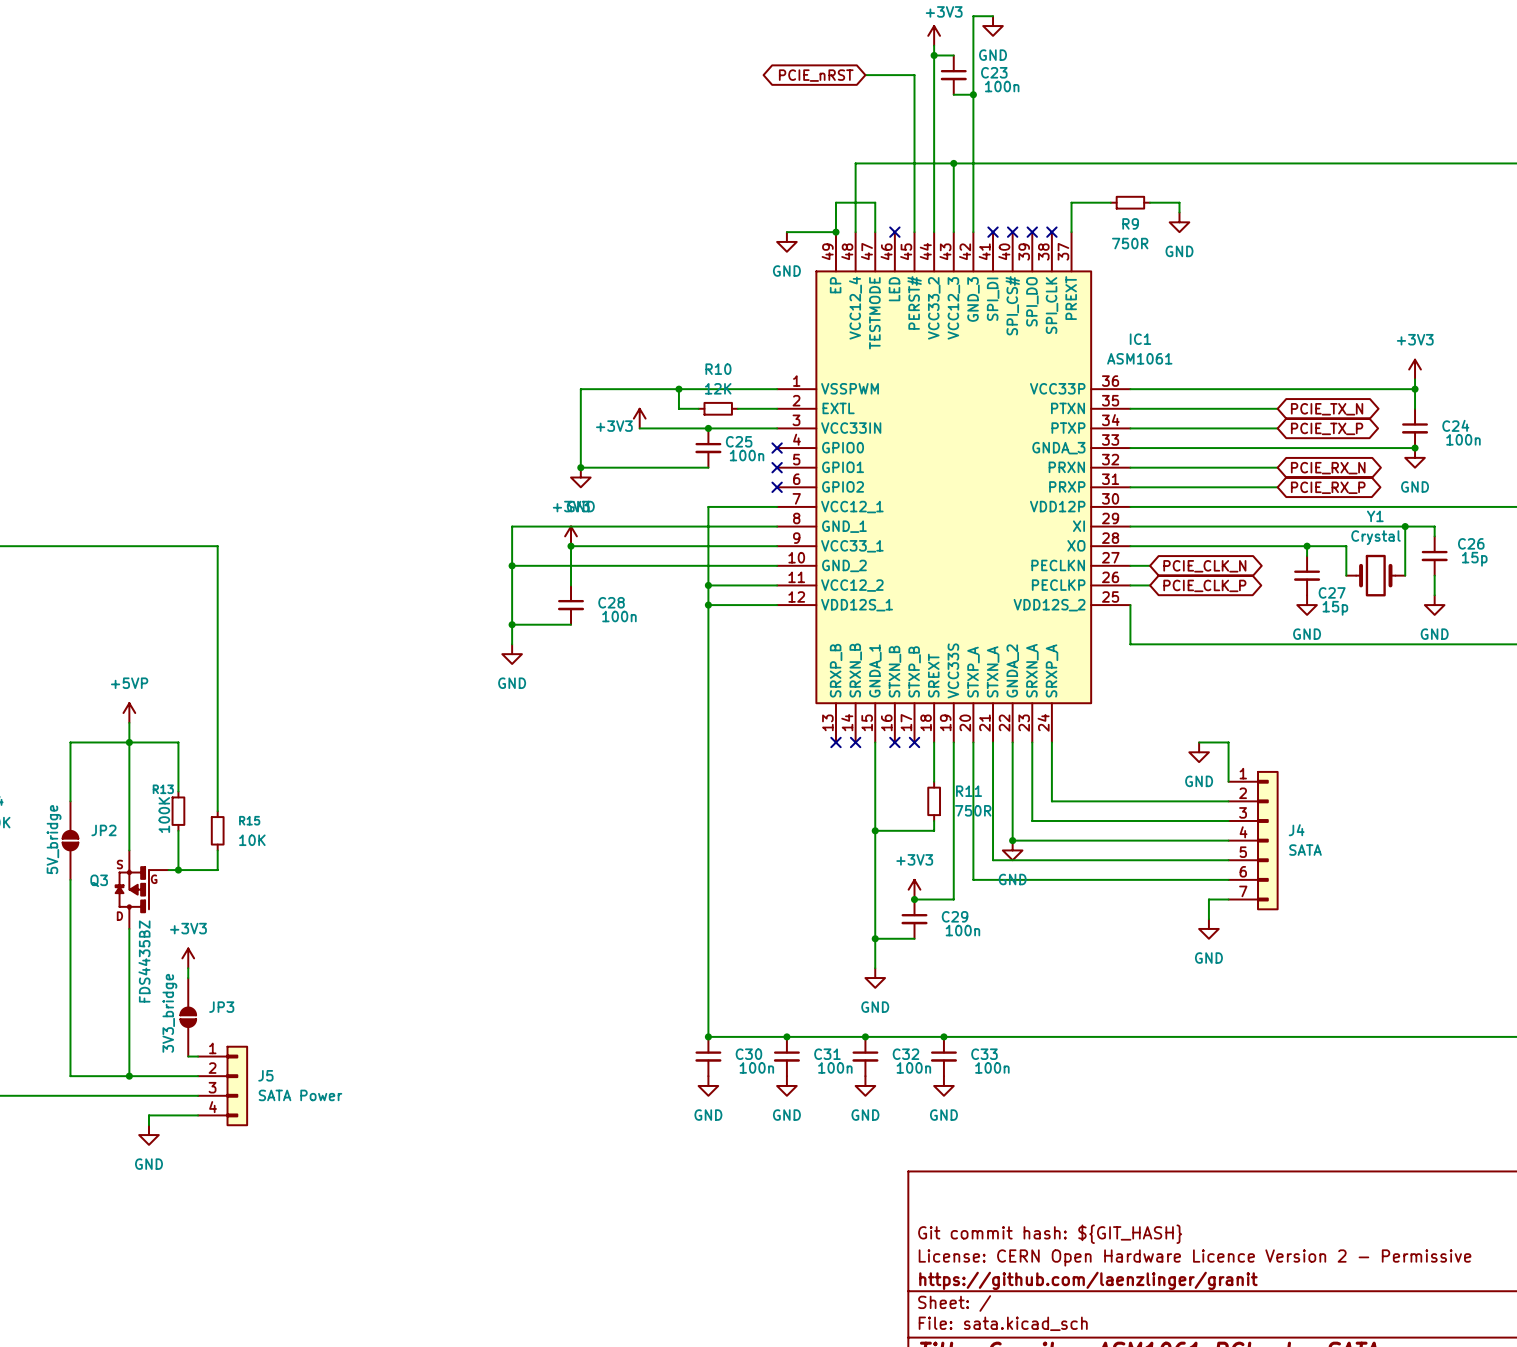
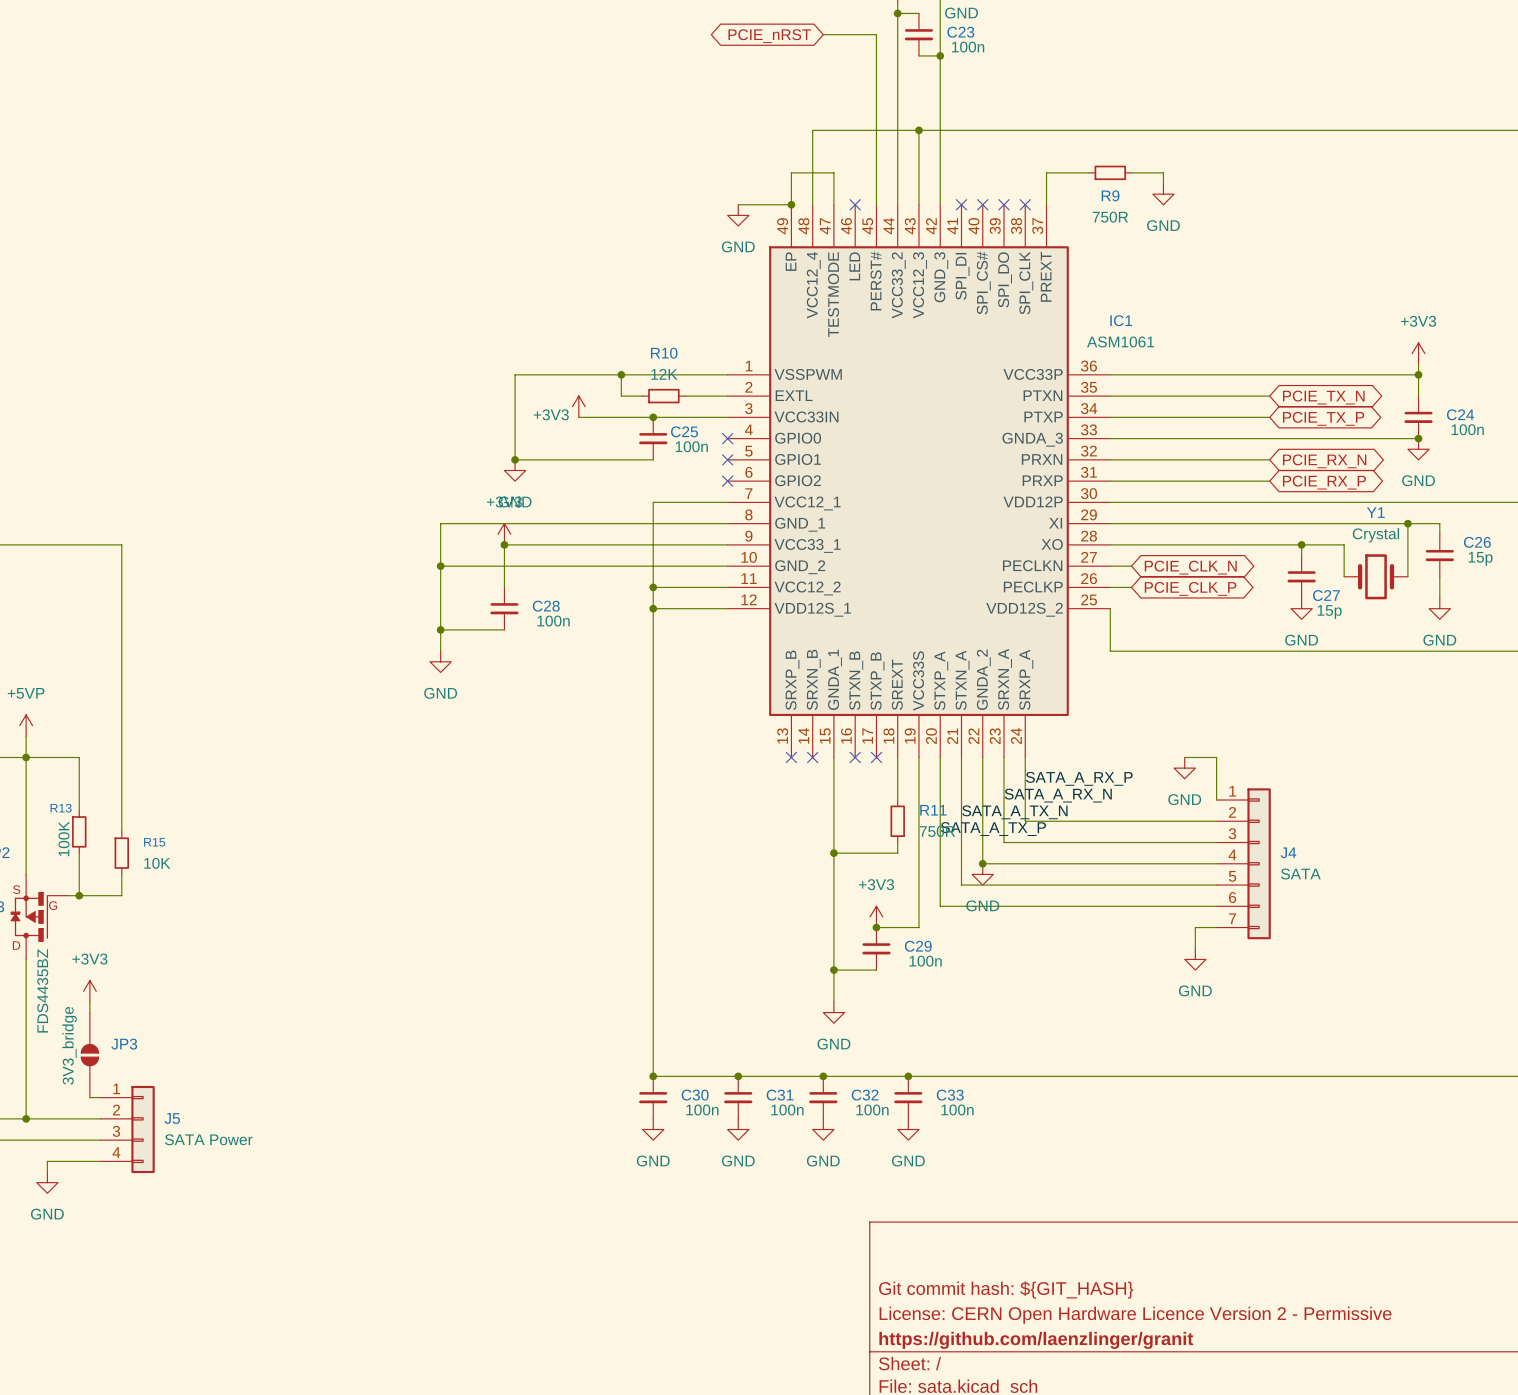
label: none -> SATA_A_RX_P (1079, 778)
label: none -> SATA_A_RX_N (1058, 795)
label: none -> SATA_A_TX_N (1014, 812)
label: none -> SATA_A_TX_P (993, 829)

